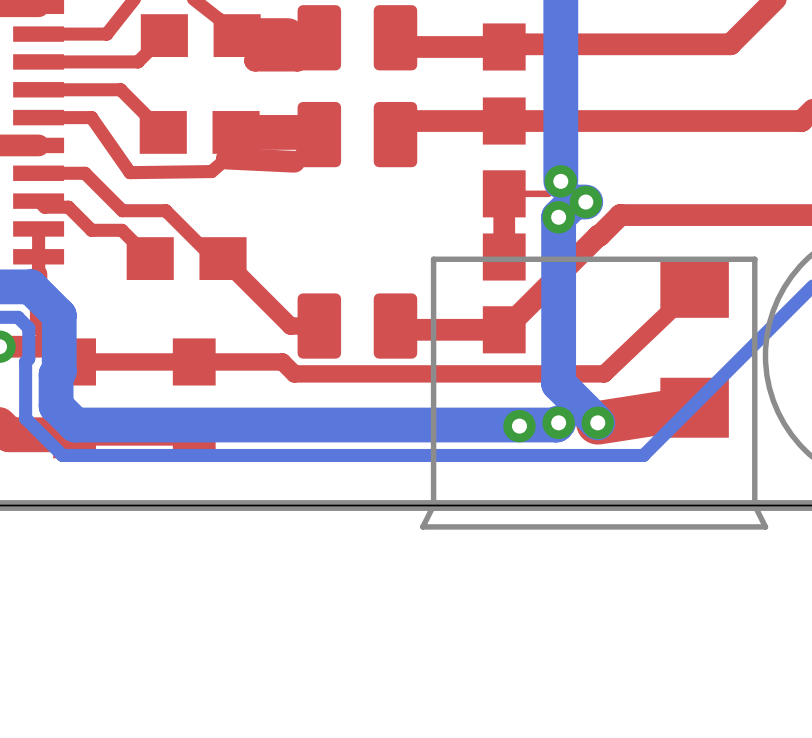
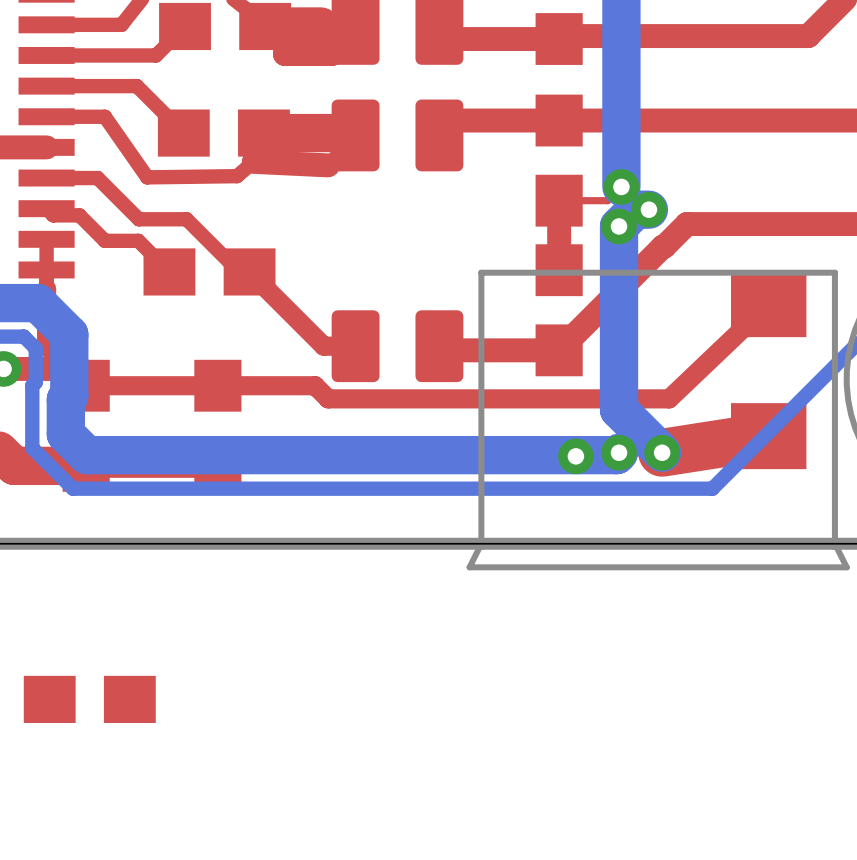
part: none -> (89, 699)

